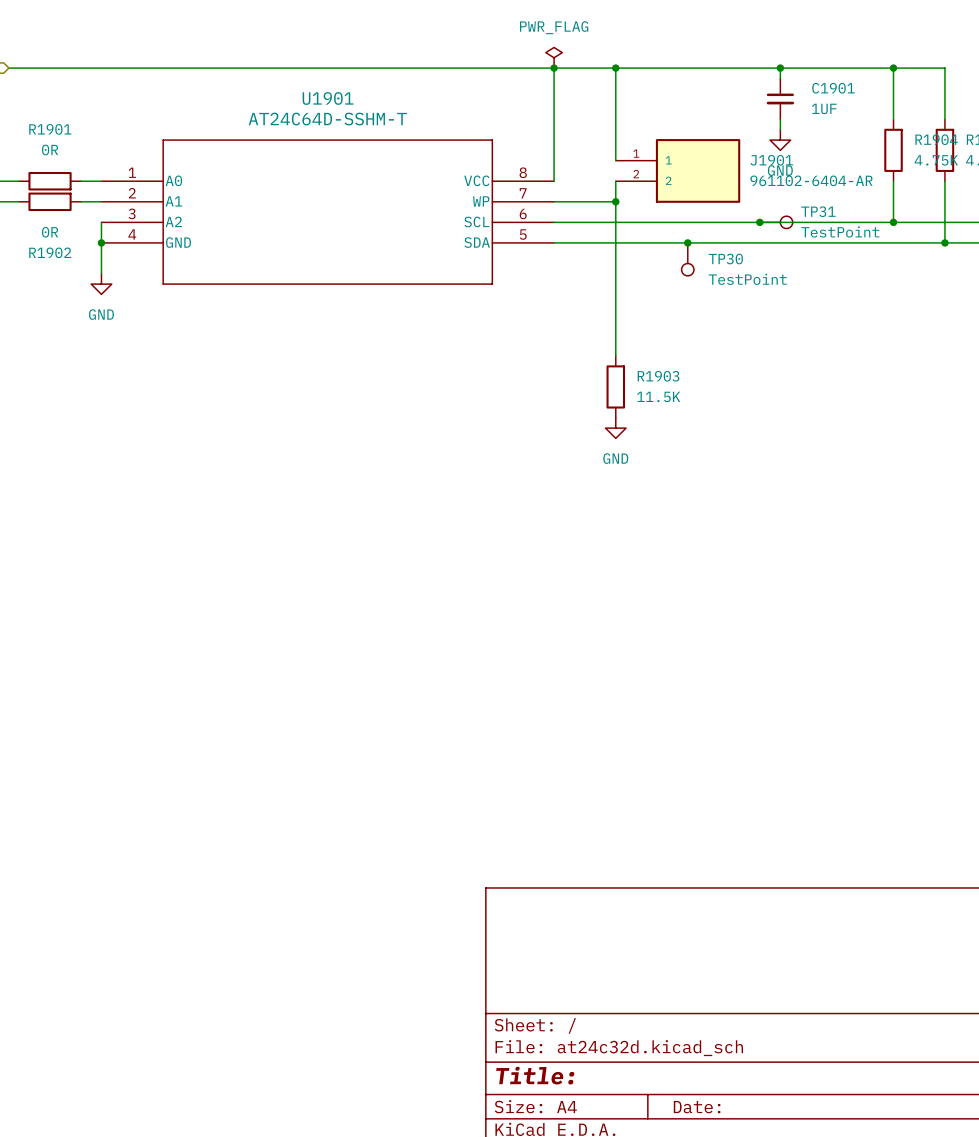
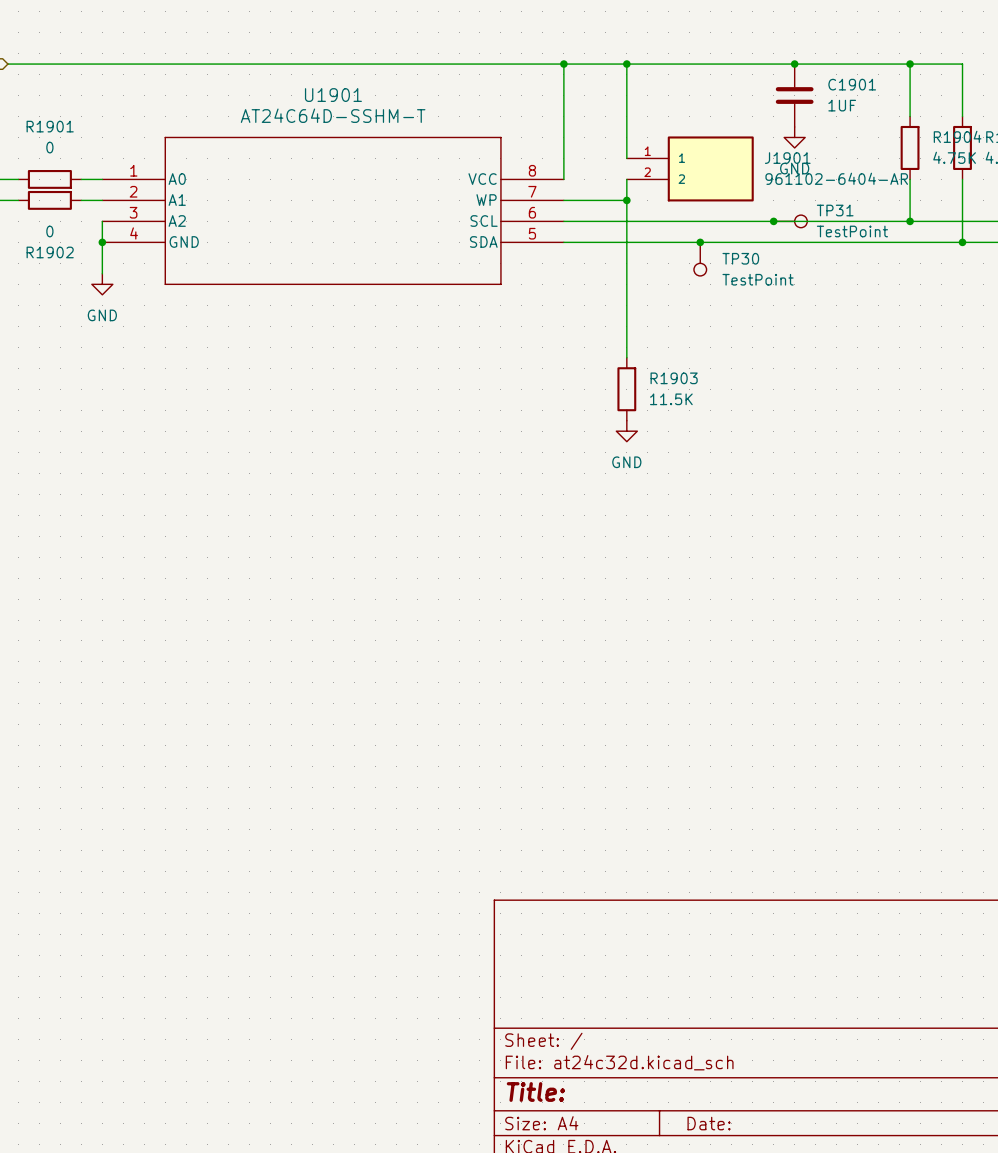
power symbol: PWR_FLAG (554, 57) -> none
C1901 symbol: [766, 78, 795, 120] -> [775, 64, 814, 127]
R1901 value: 0R (50, 149) -> 0 (49, 147)
R1902 value: 0R (50, 232) -> 0 (49, 231)

